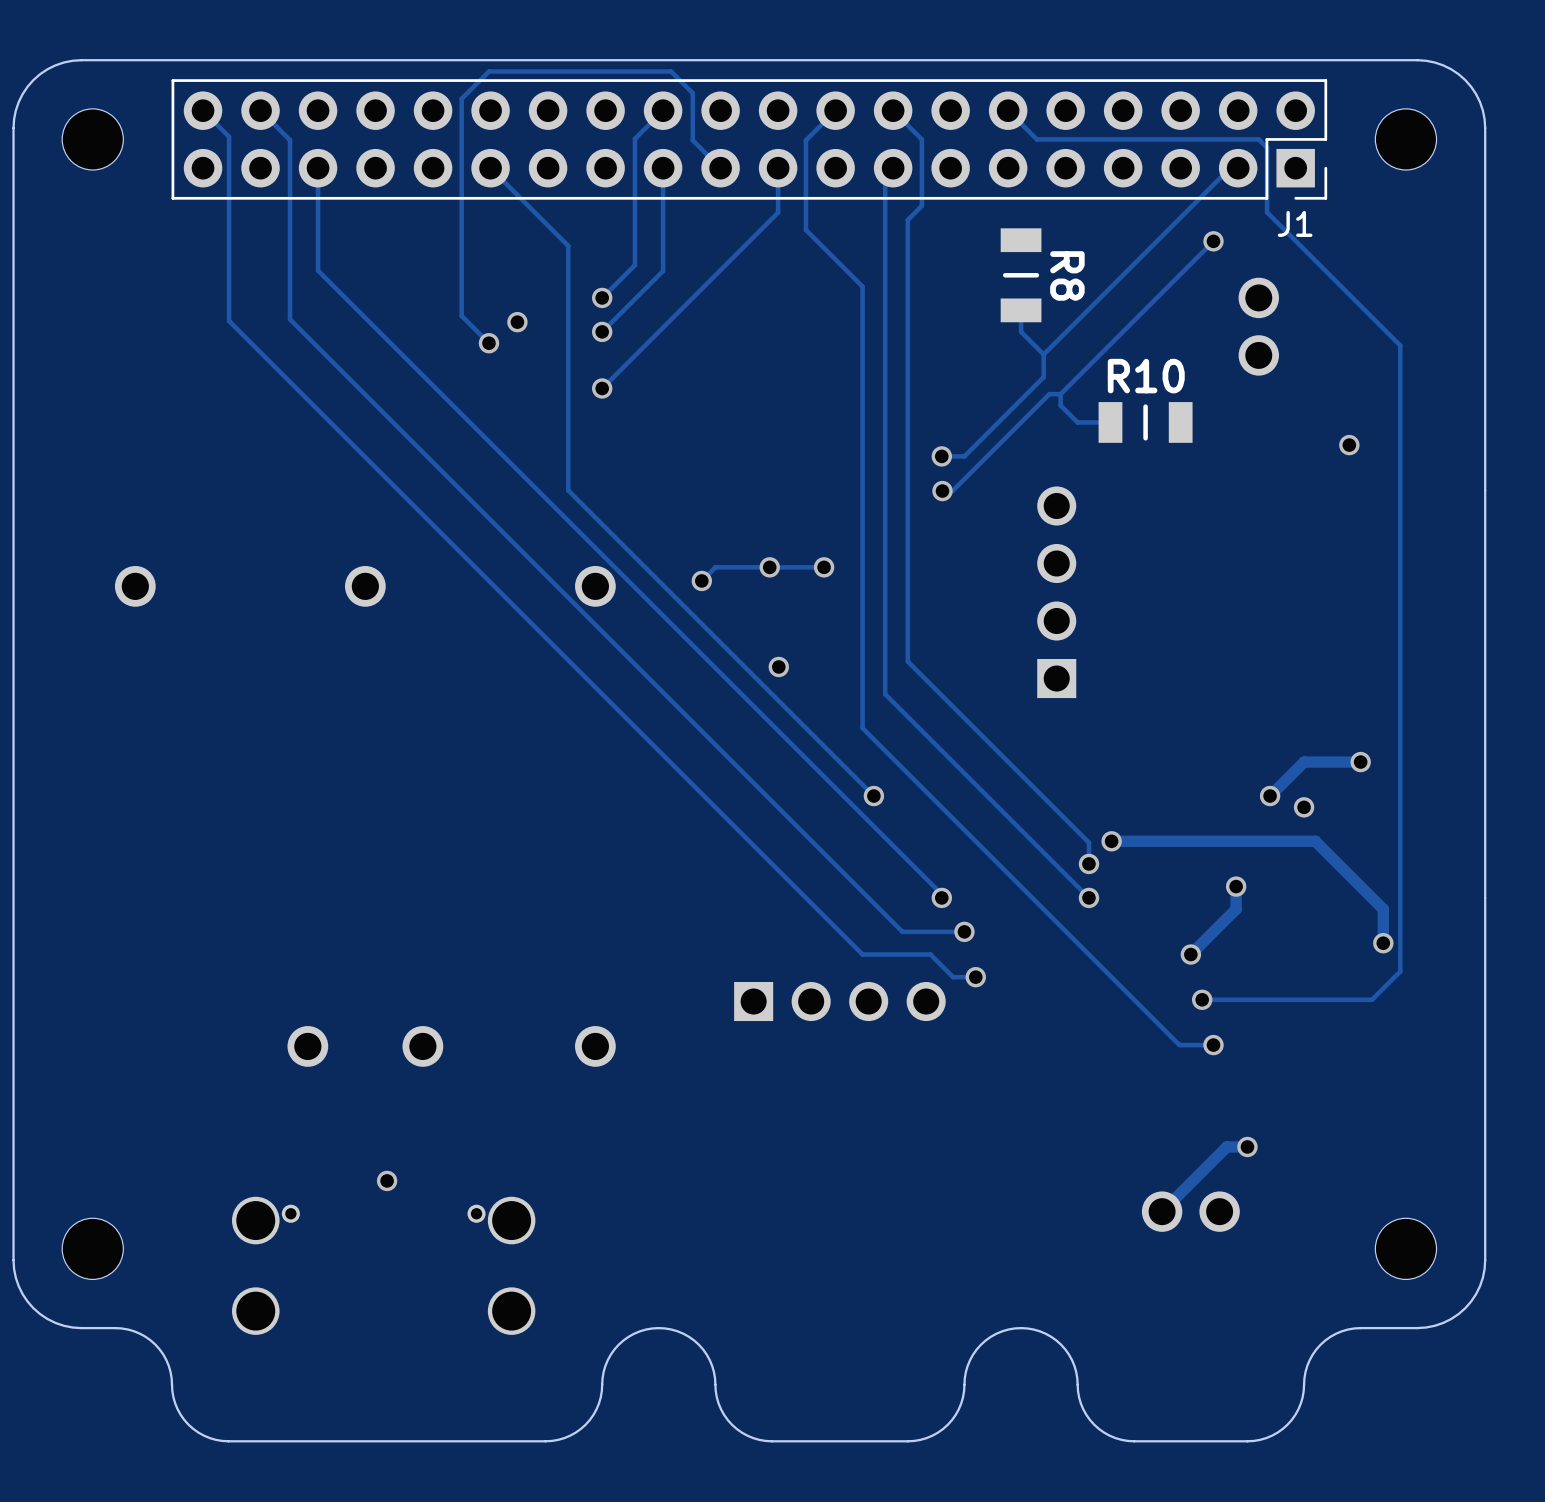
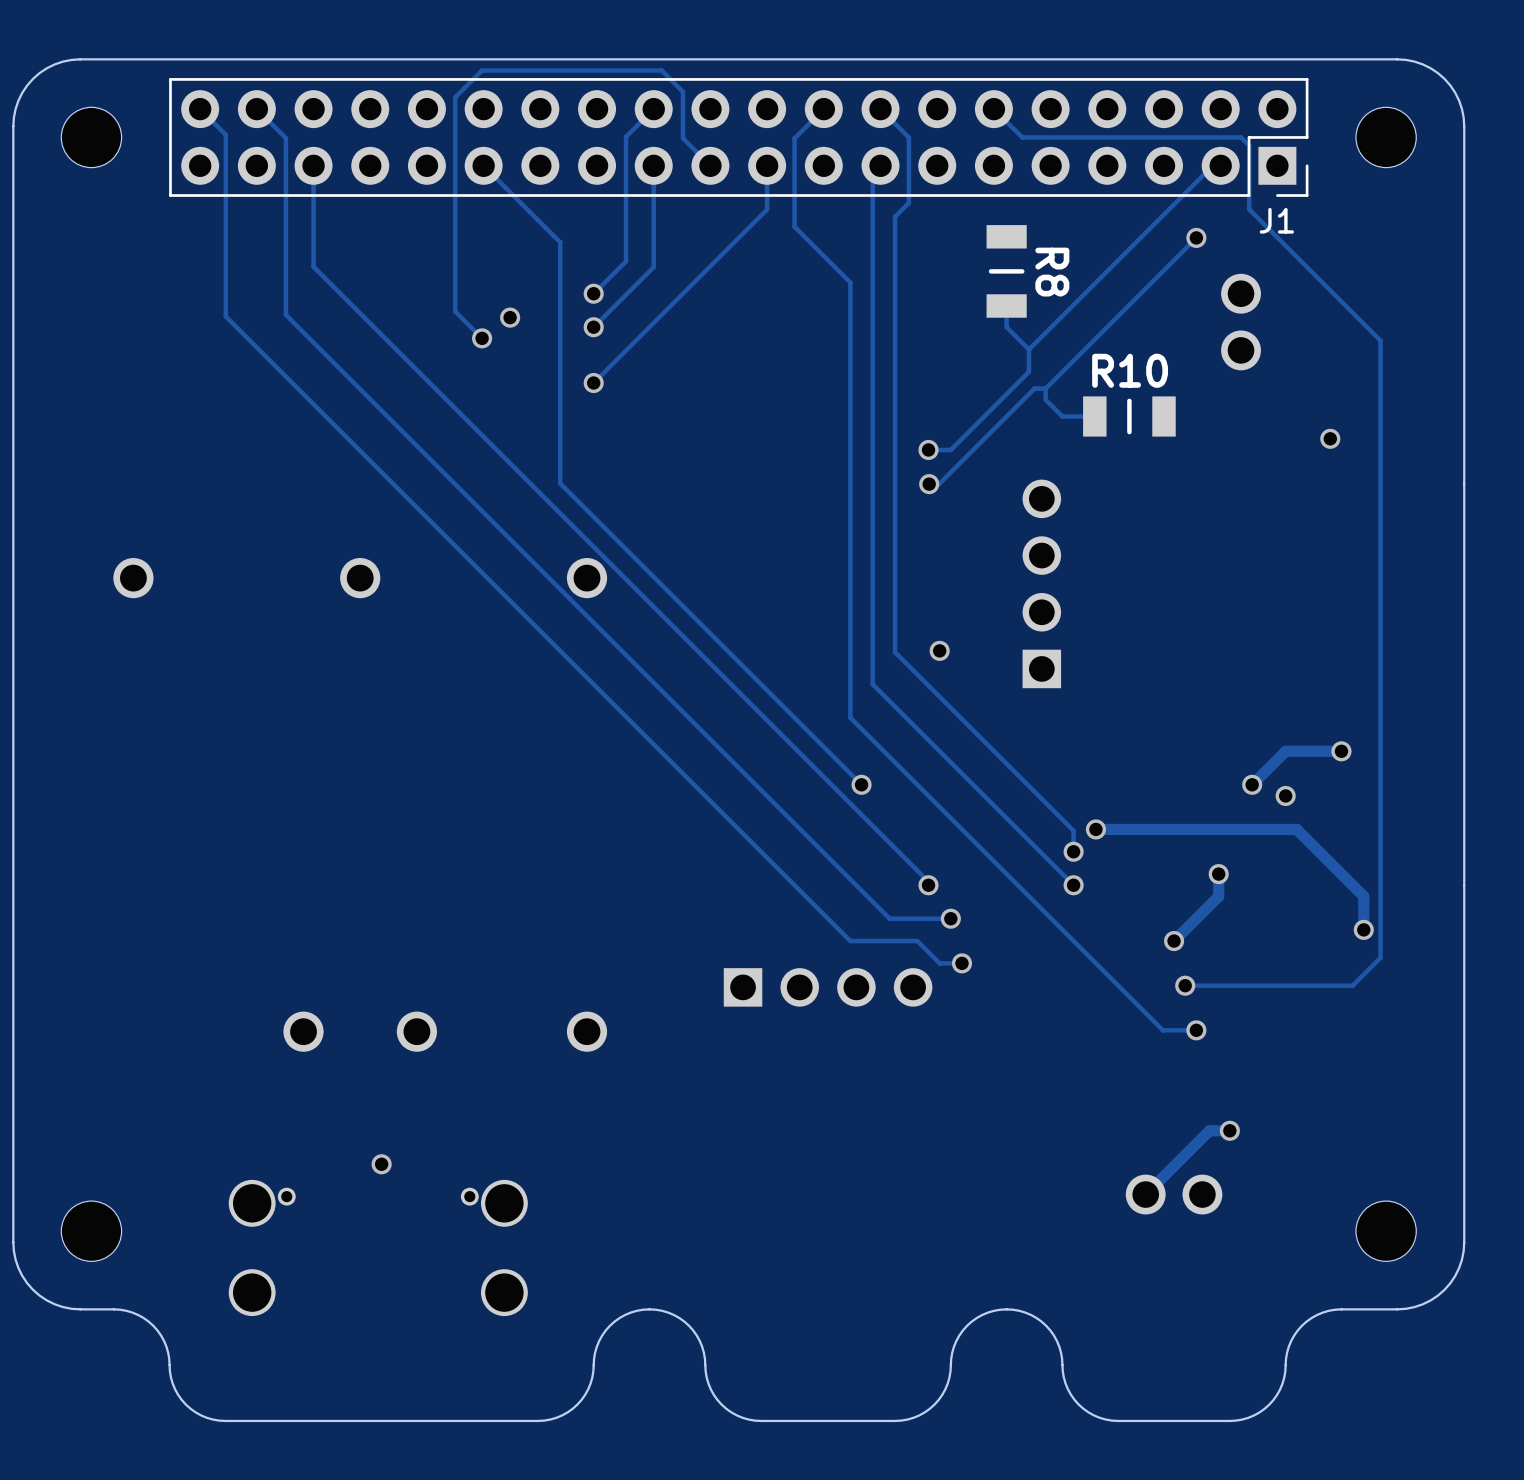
via: (769, 567) -> none
track: (824, 567) (715, 567) (701, 580) -> none
via: (824, 567) -> none
via: (701, 580) -> none
via: none -> (939, 650)
via: (778, 666) -> none

